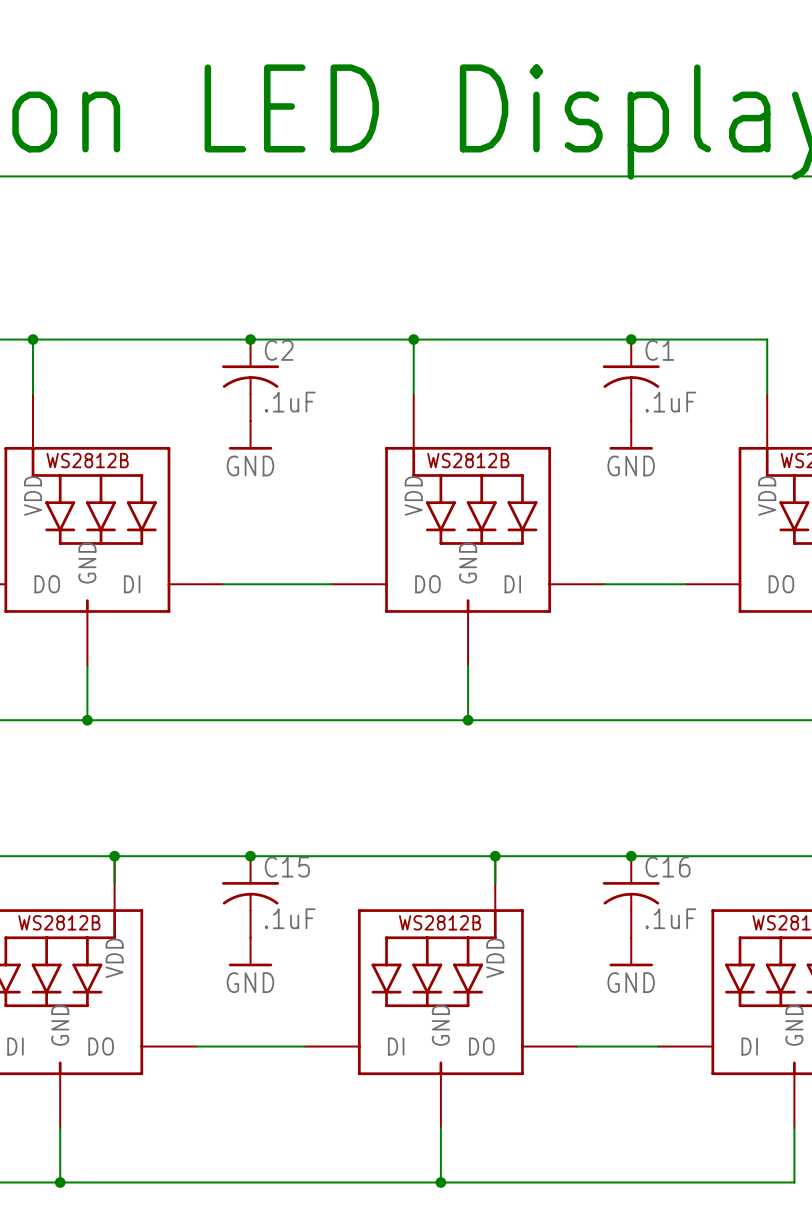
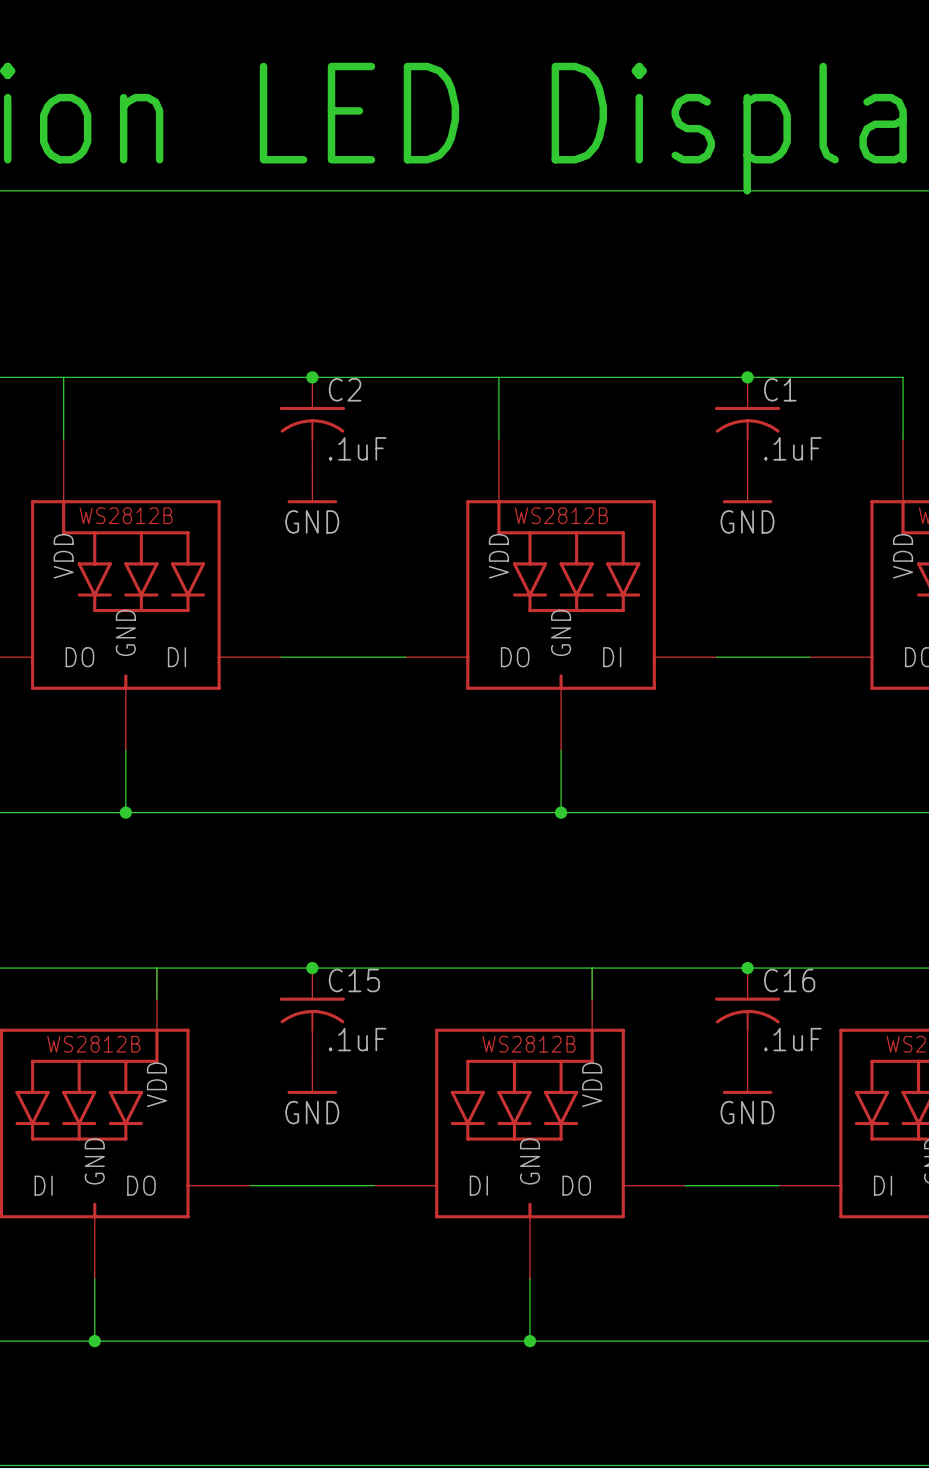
junction: (33, 339) -> none
junction: (413, 339) -> none
junction: (114, 856) -> none
junction: (495, 856) -> none

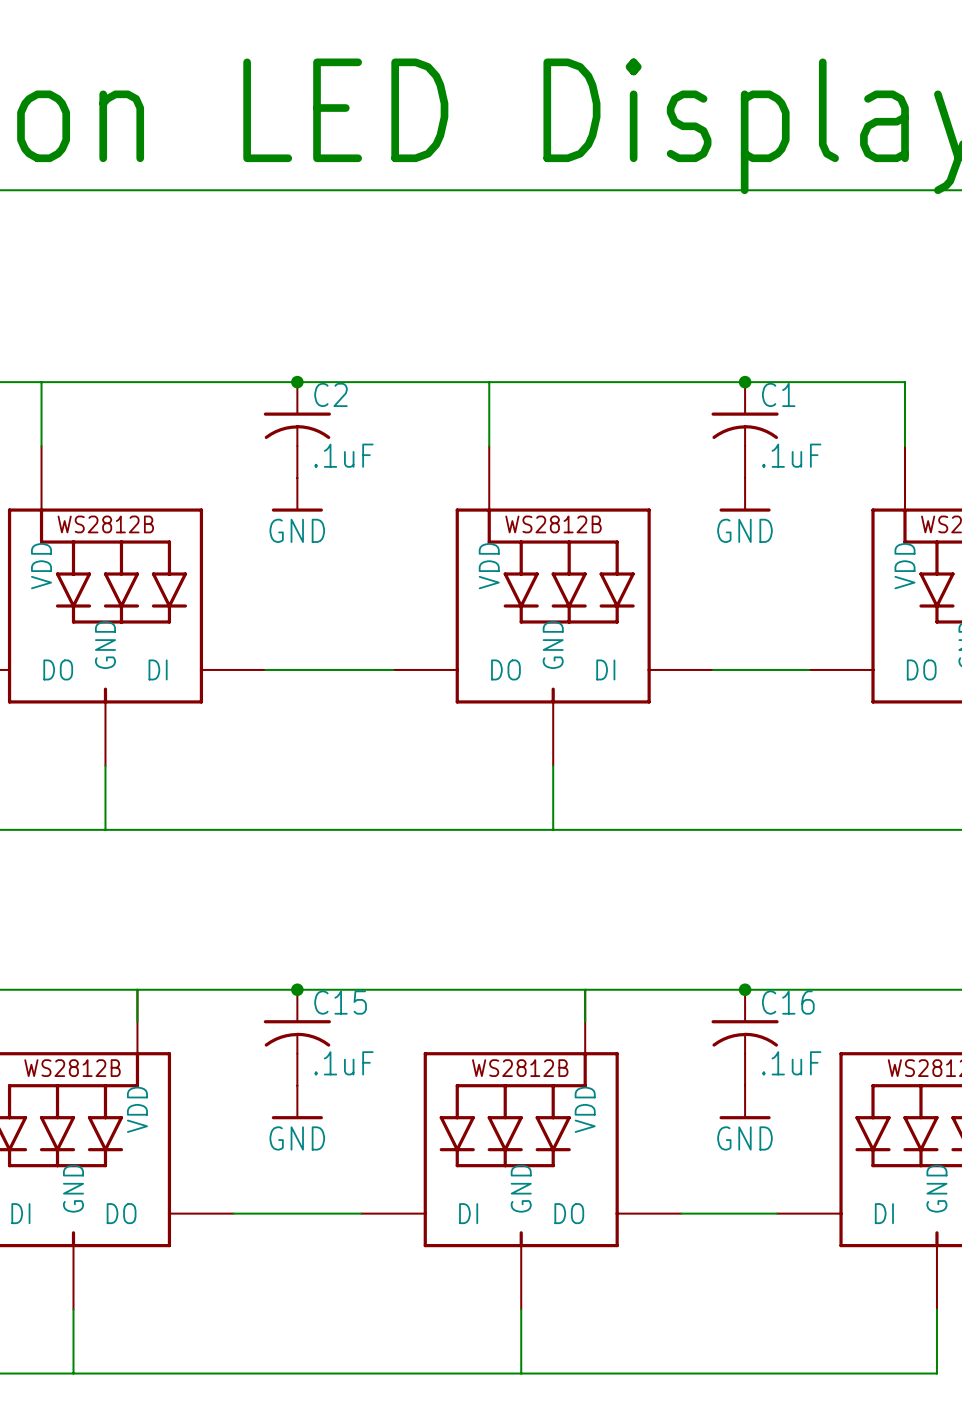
junction: (125, 812) -> none
junction: (561, 812) -> none
junction: (94, 1341) -> none
junction: (529, 1341) -> none

